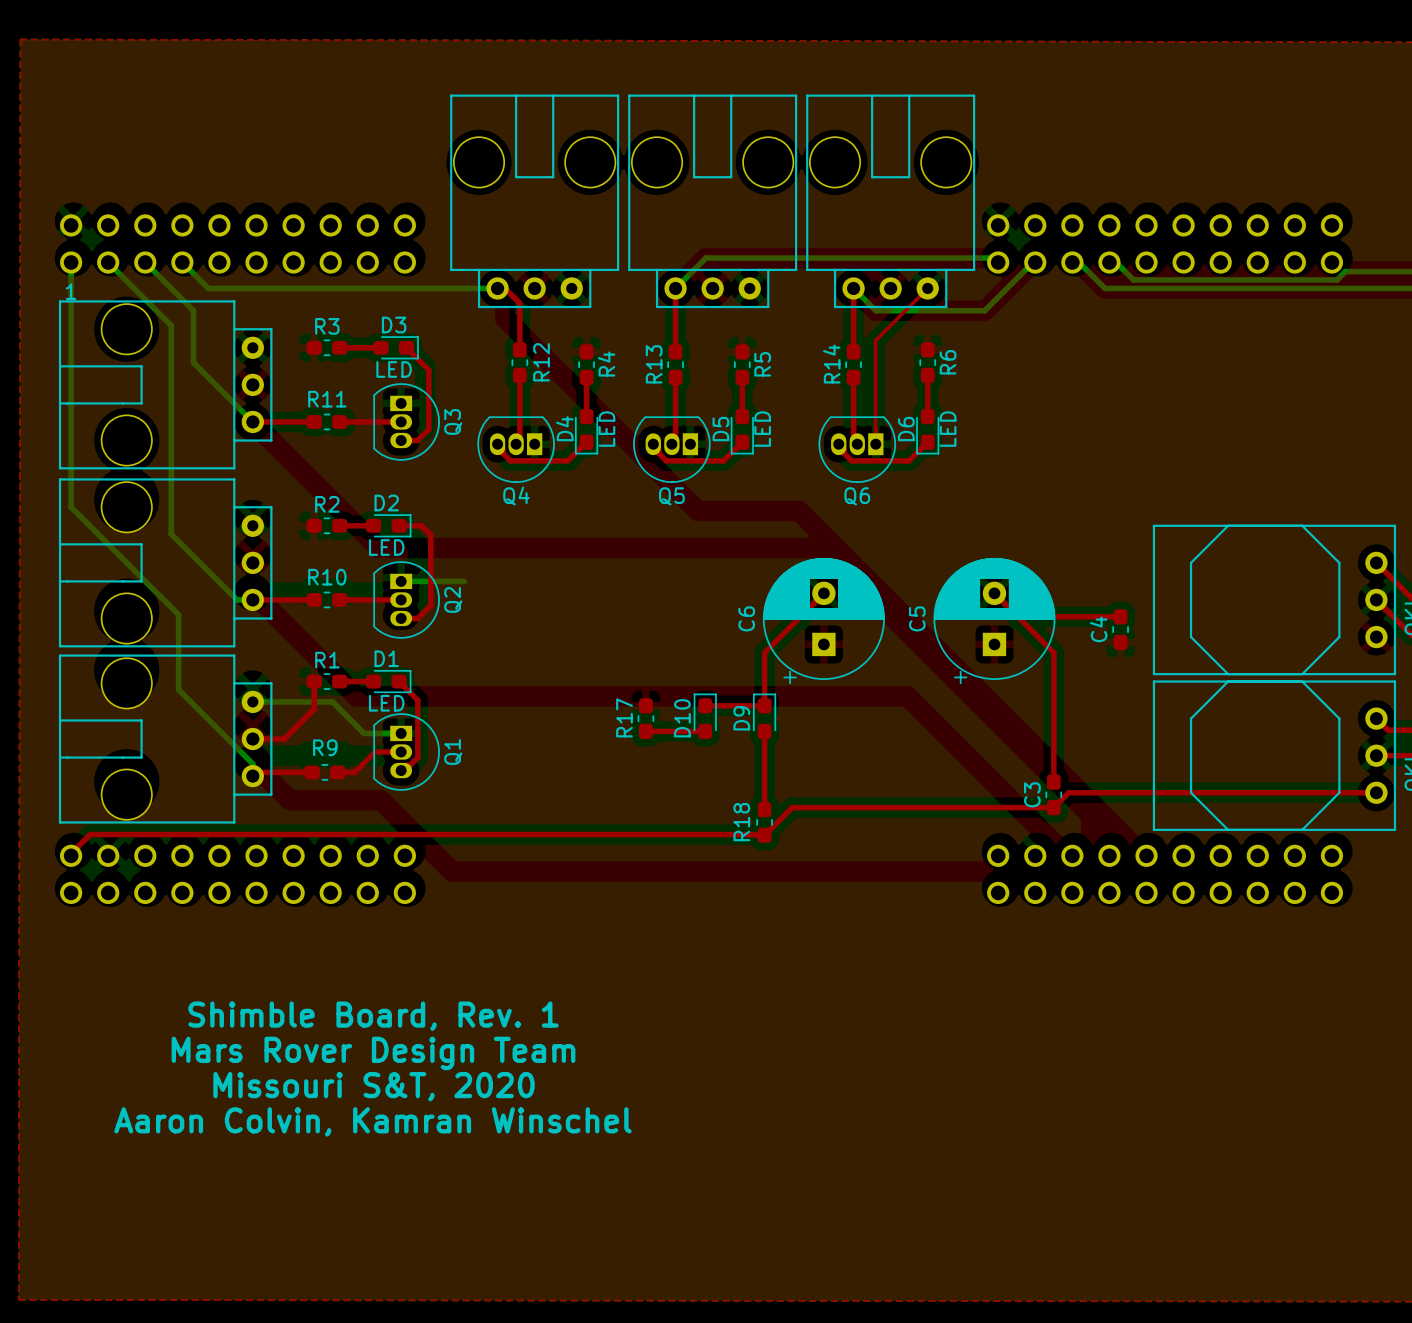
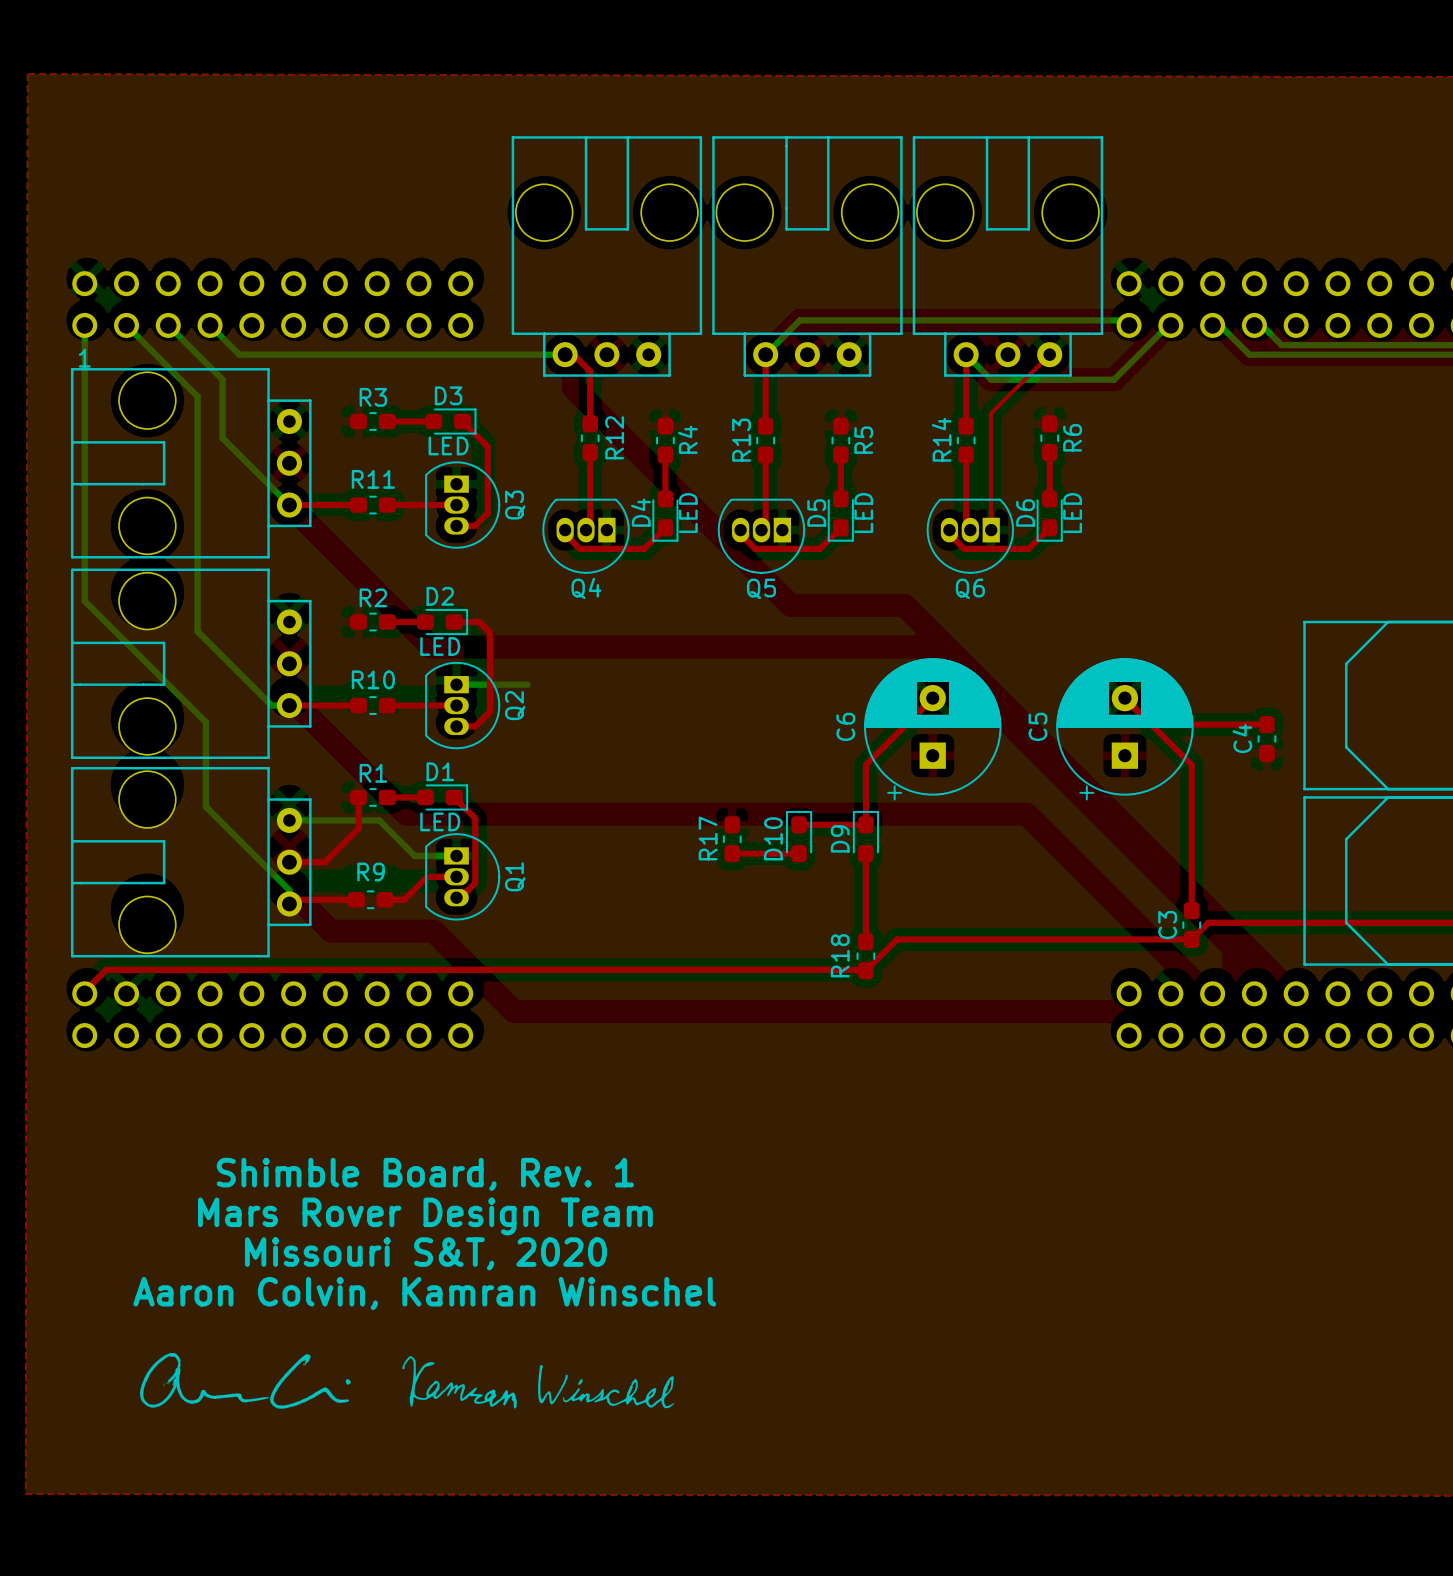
drawing: none -> [139, 1352, 351, 1409]
drawing: none -> [402, 1356, 675, 1409]

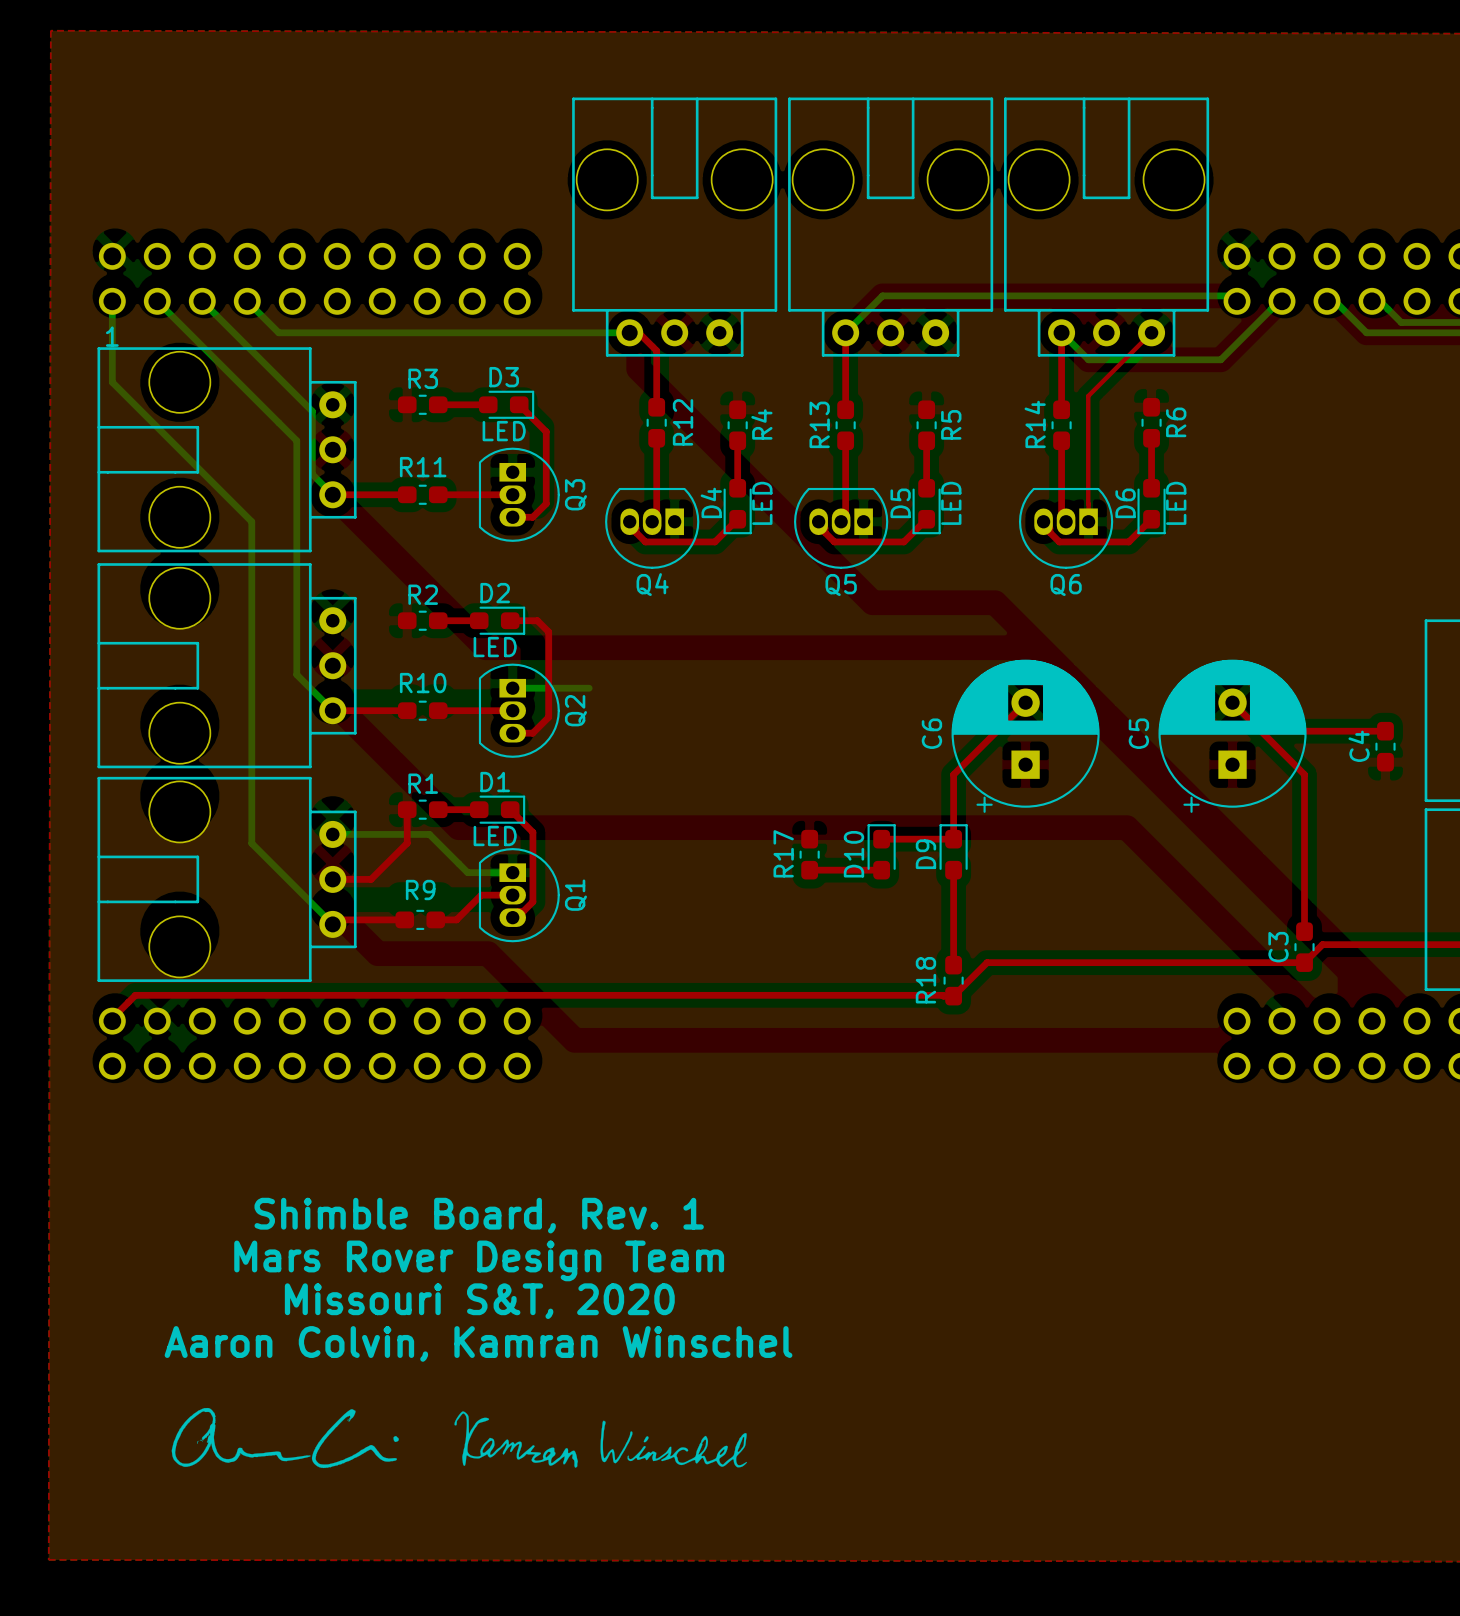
bottom track: (222, 379) (222, 438) (270, 486) -> (260, 359) (312, 411) (312, 474)
bottom track: (197, 396) (197, 631) (271, 705) (289, 705) -> (233, 377) (296, 440) (296, 674) (332, 710)
bottom track: (84, 400) (84, 601) (205, 722) (205, 806) (289, 890) (289, 903) -> (112, 382) (251, 521) (251, 843) (332, 924)

